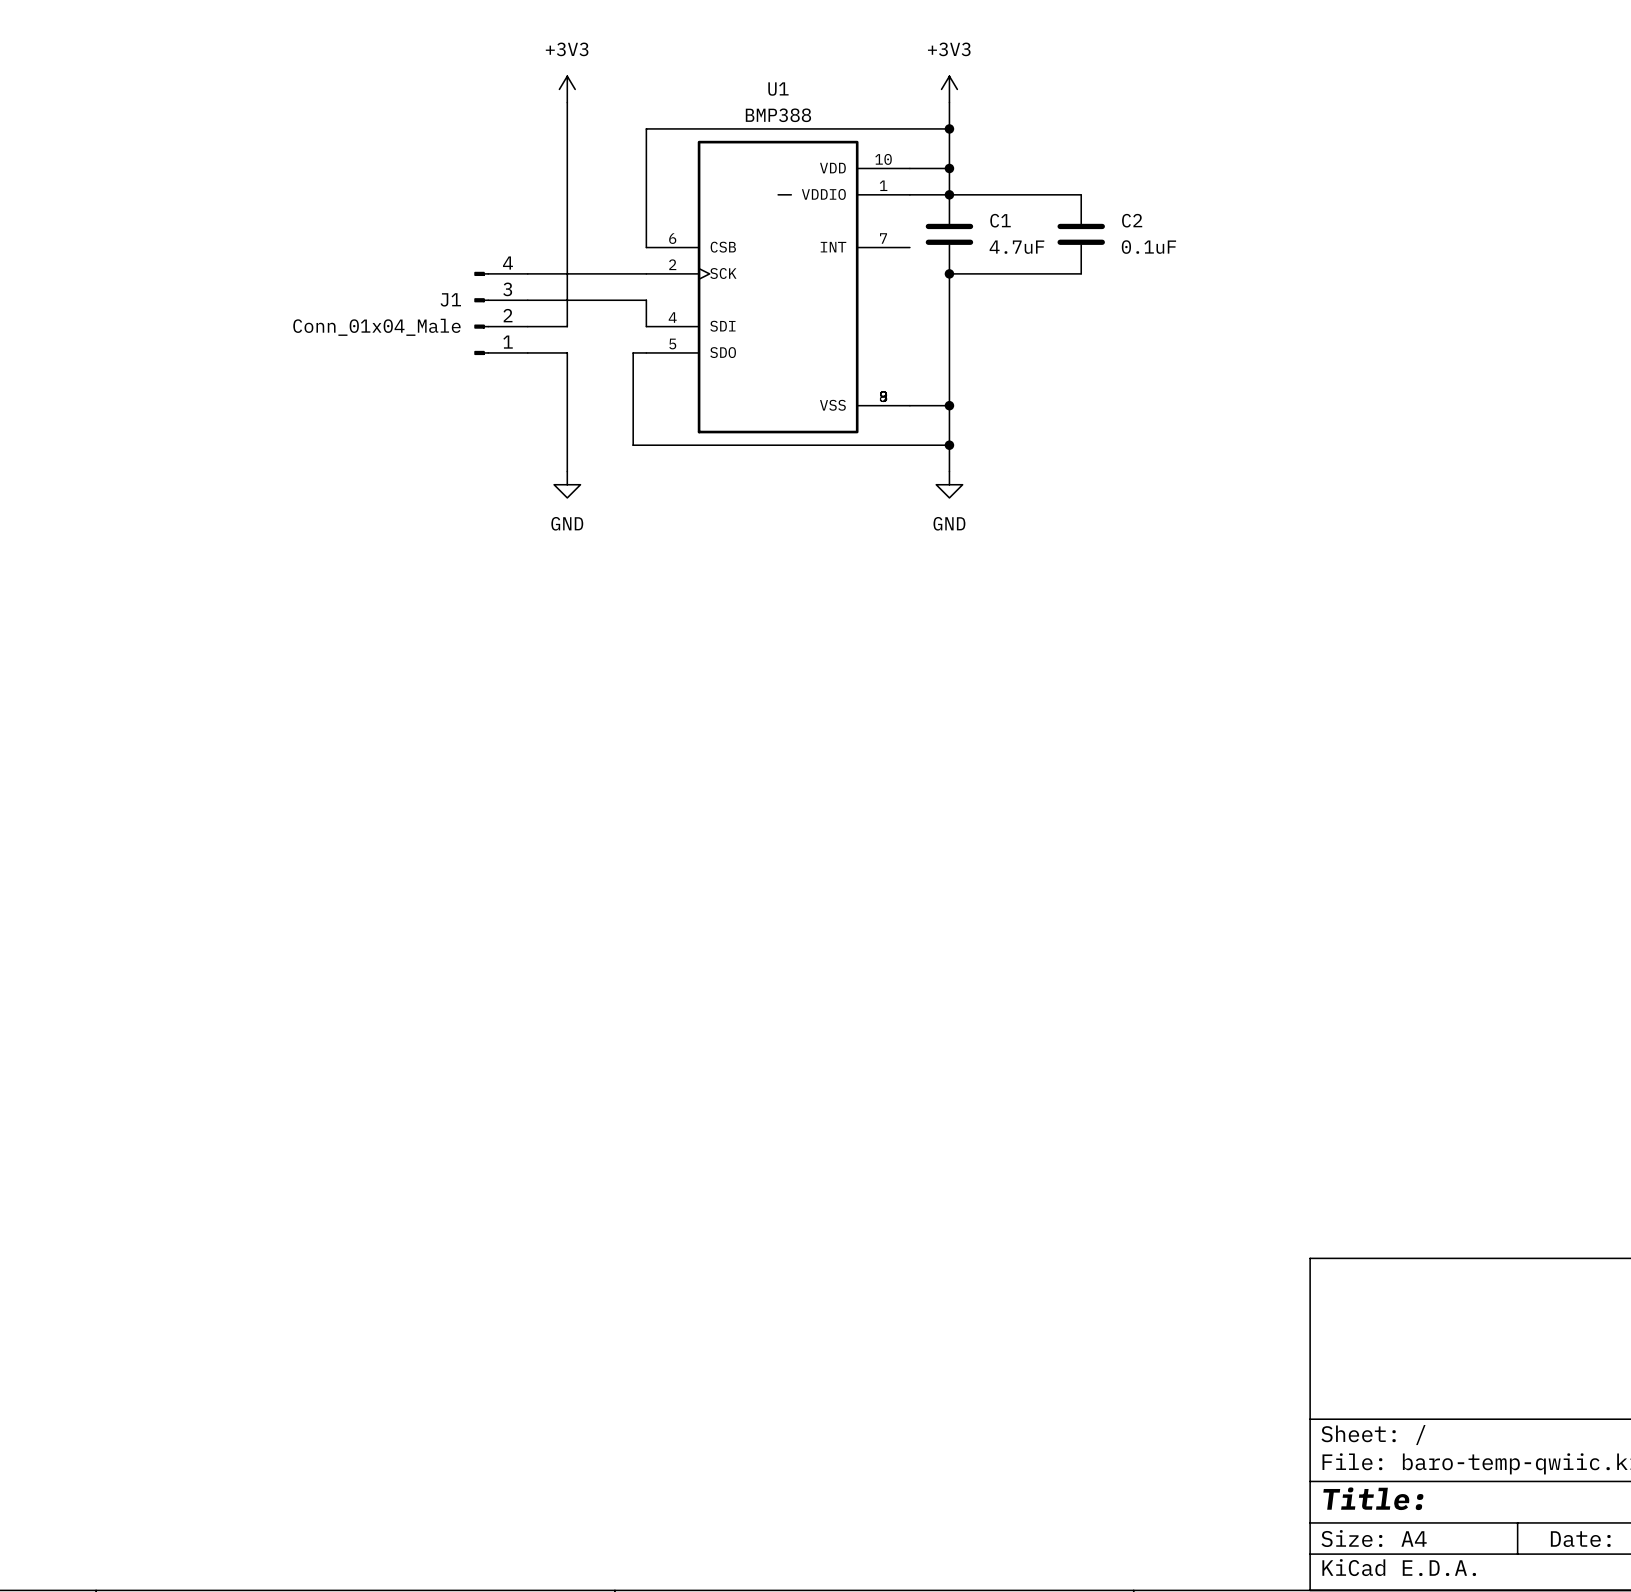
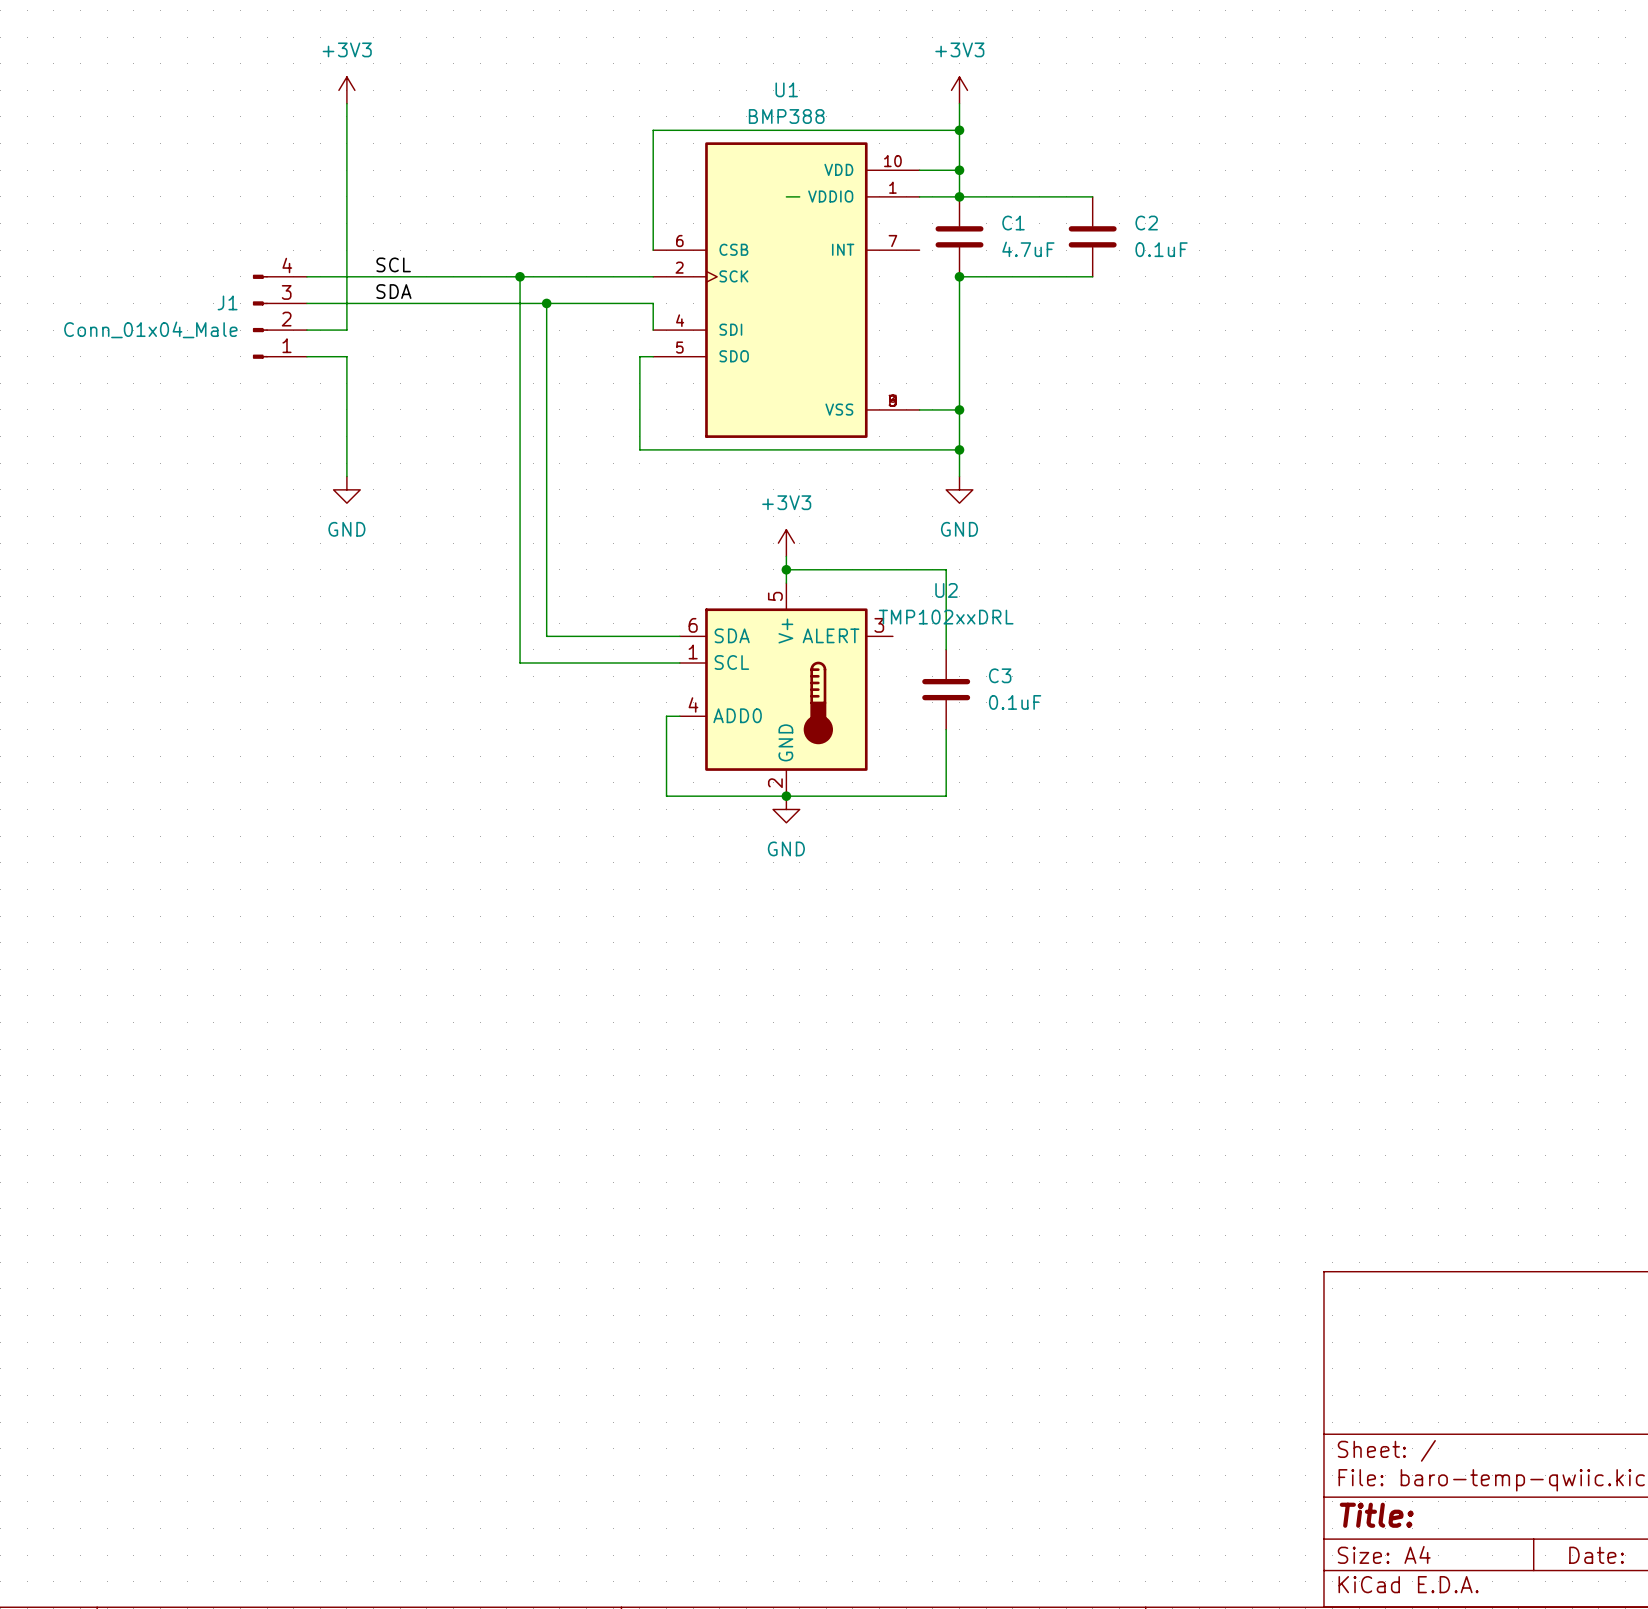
power symbol position: +3V3 (567, 89) -> +3V3 (346, 90)
wire: (567, 102) (567, 326) (527, 326) -> (346, 103) (346, 330) (306, 330)
label: none -> SCL (393, 264)
wire: none -> (306, 276) (533, 276)
wire: none -> (520, 276) (520, 662) (679, 662)
junction: none -> (520, 276)
label: none -> SDA (393, 291)
wire: none -> (306, 303) (533, 303)
wire: none -> (546, 303) (546, 636) (679, 636)
junction: none -> (546, 303)
J1 position: (501, 313) -> (279, 316)
wire: (527, 352) (567, 352) (567, 471) -> (306, 356) (346, 356) (346, 476)
power symbol: none -> GND (346, 489)
power symbol: GND (567, 484) -> none
power symbol: none -> +3V3 (786, 543)
wire: none -> (786, 556) (786, 583)
wire: none -> (786, 569) (946, 569) (946, 649)
junction: none -> (786, 569)
U2: none -> TMP102xxDRL (786, 689)
C3: none -> 0.1uF (946, 689)
wire: none -> (679, 716) (666, 716) (666, 796) (946, 796) (946, 729)
junction: none -> (786, 796)
power symbol: none -> GND (786, 809)

